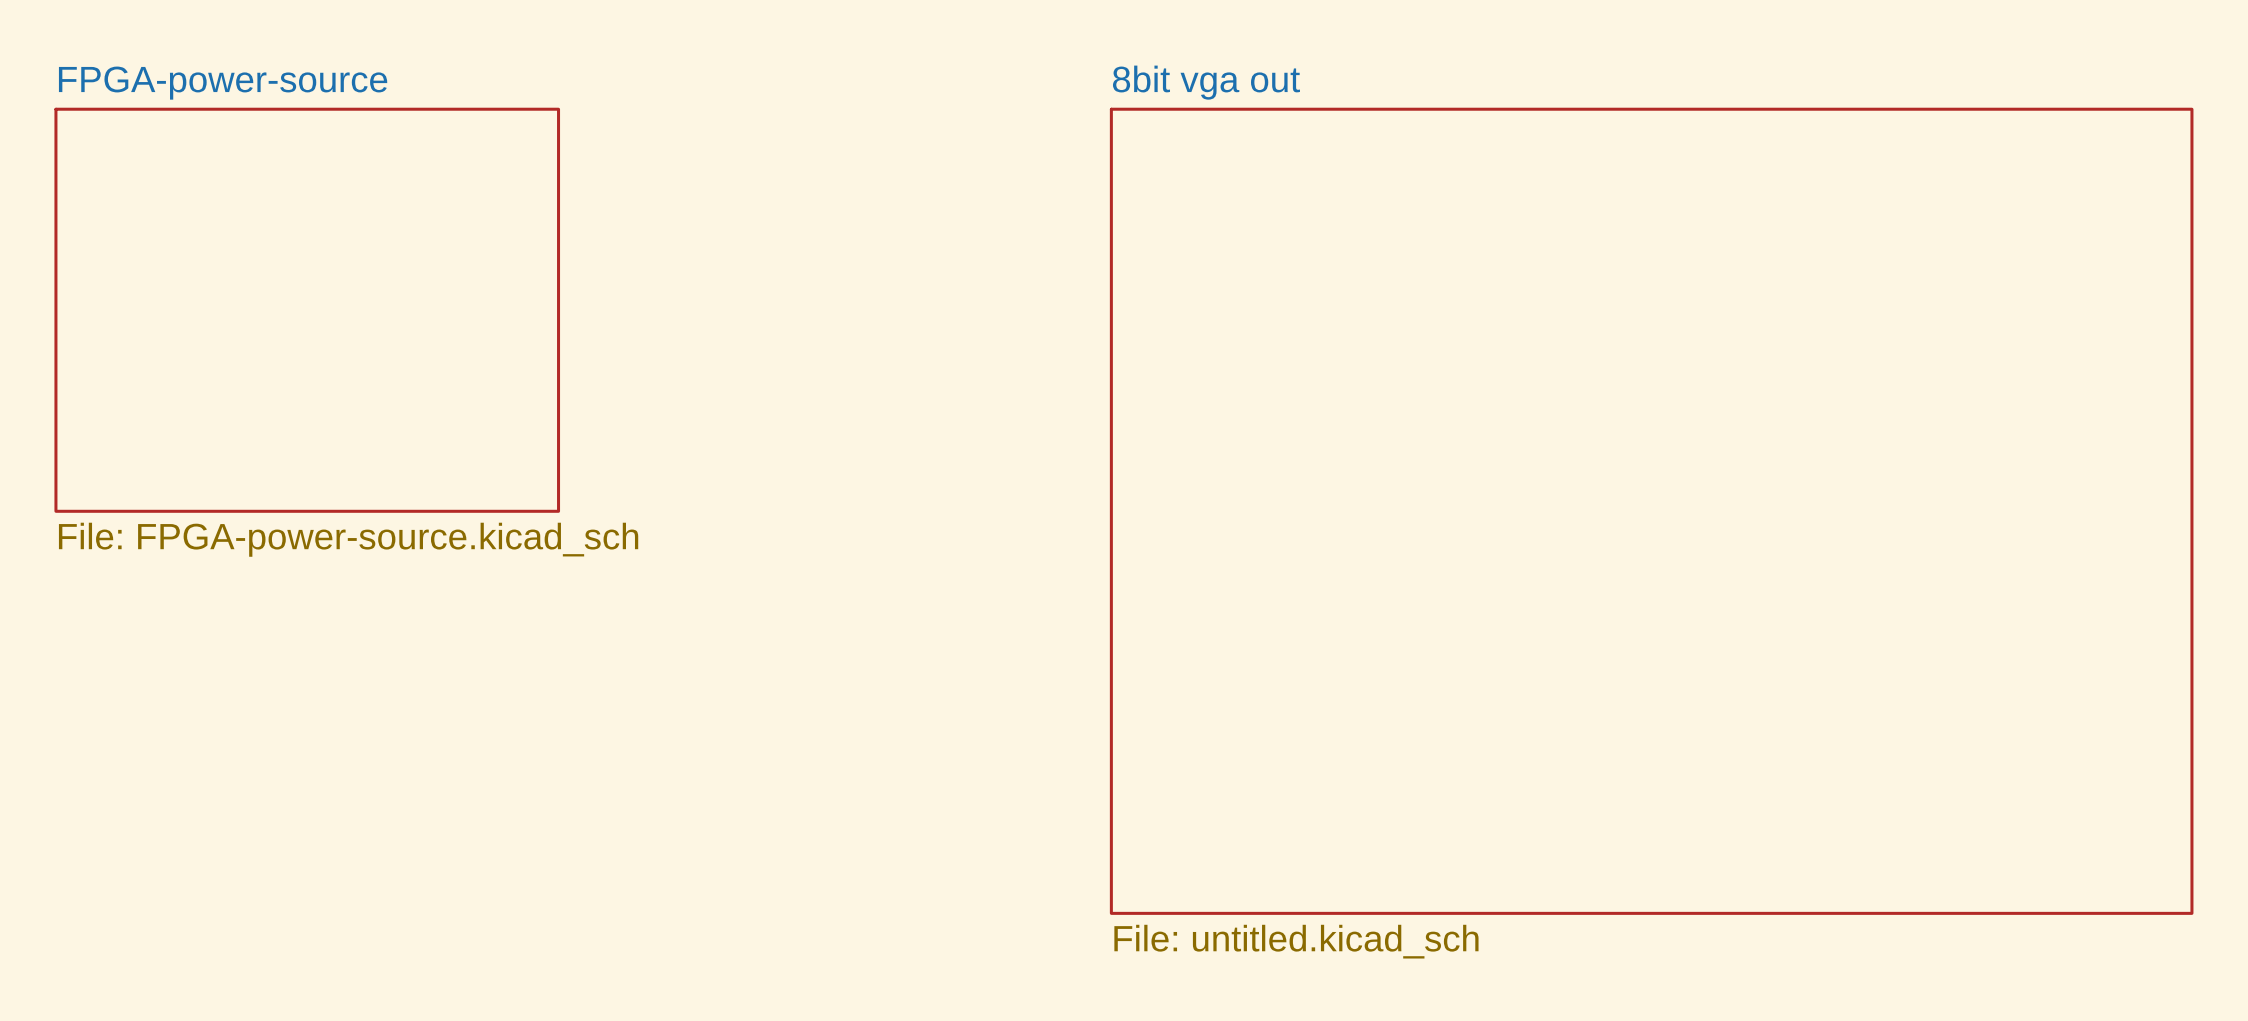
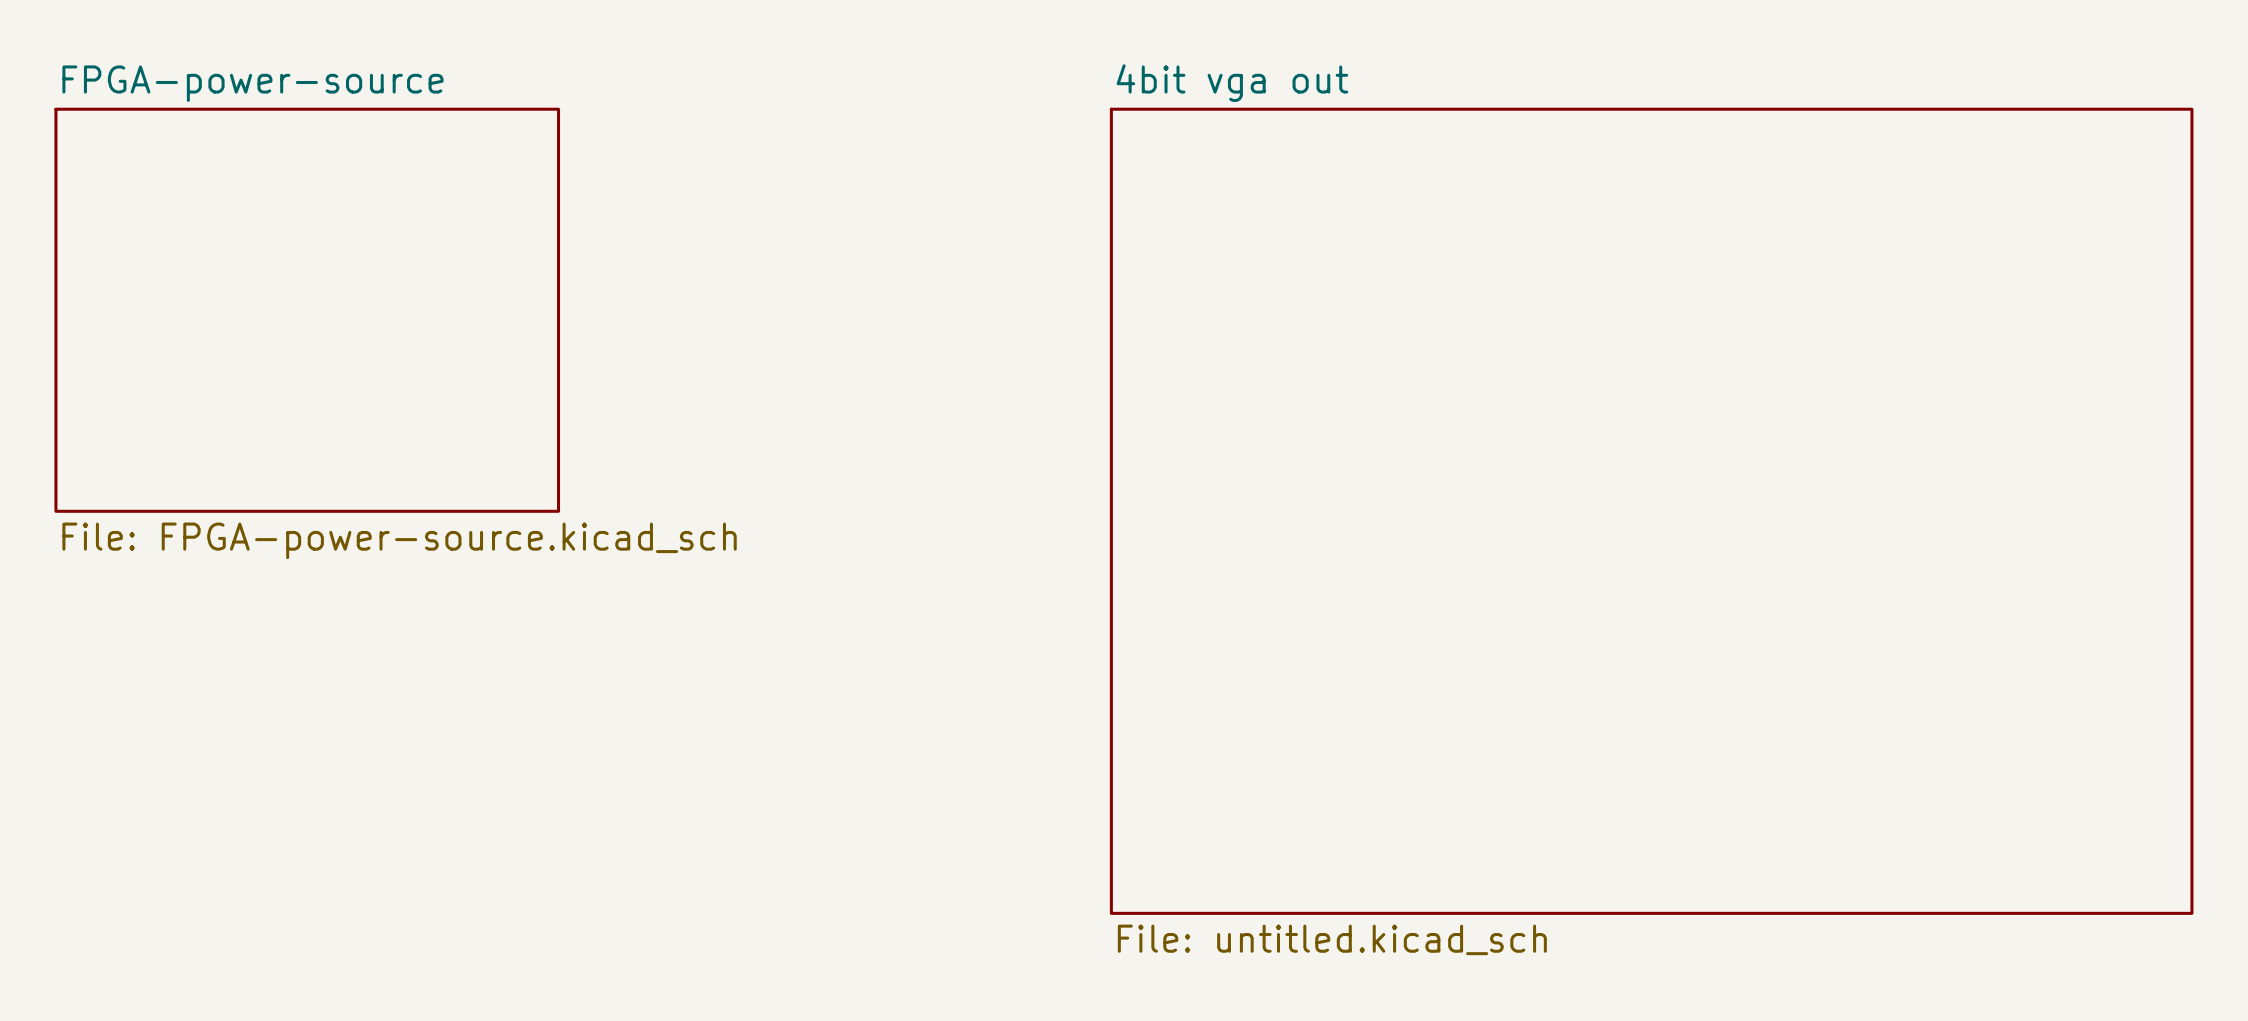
sheet 8bit vga out name: 8bit vga out (1206, 82) -> 4bit vga out (1232, 83)

